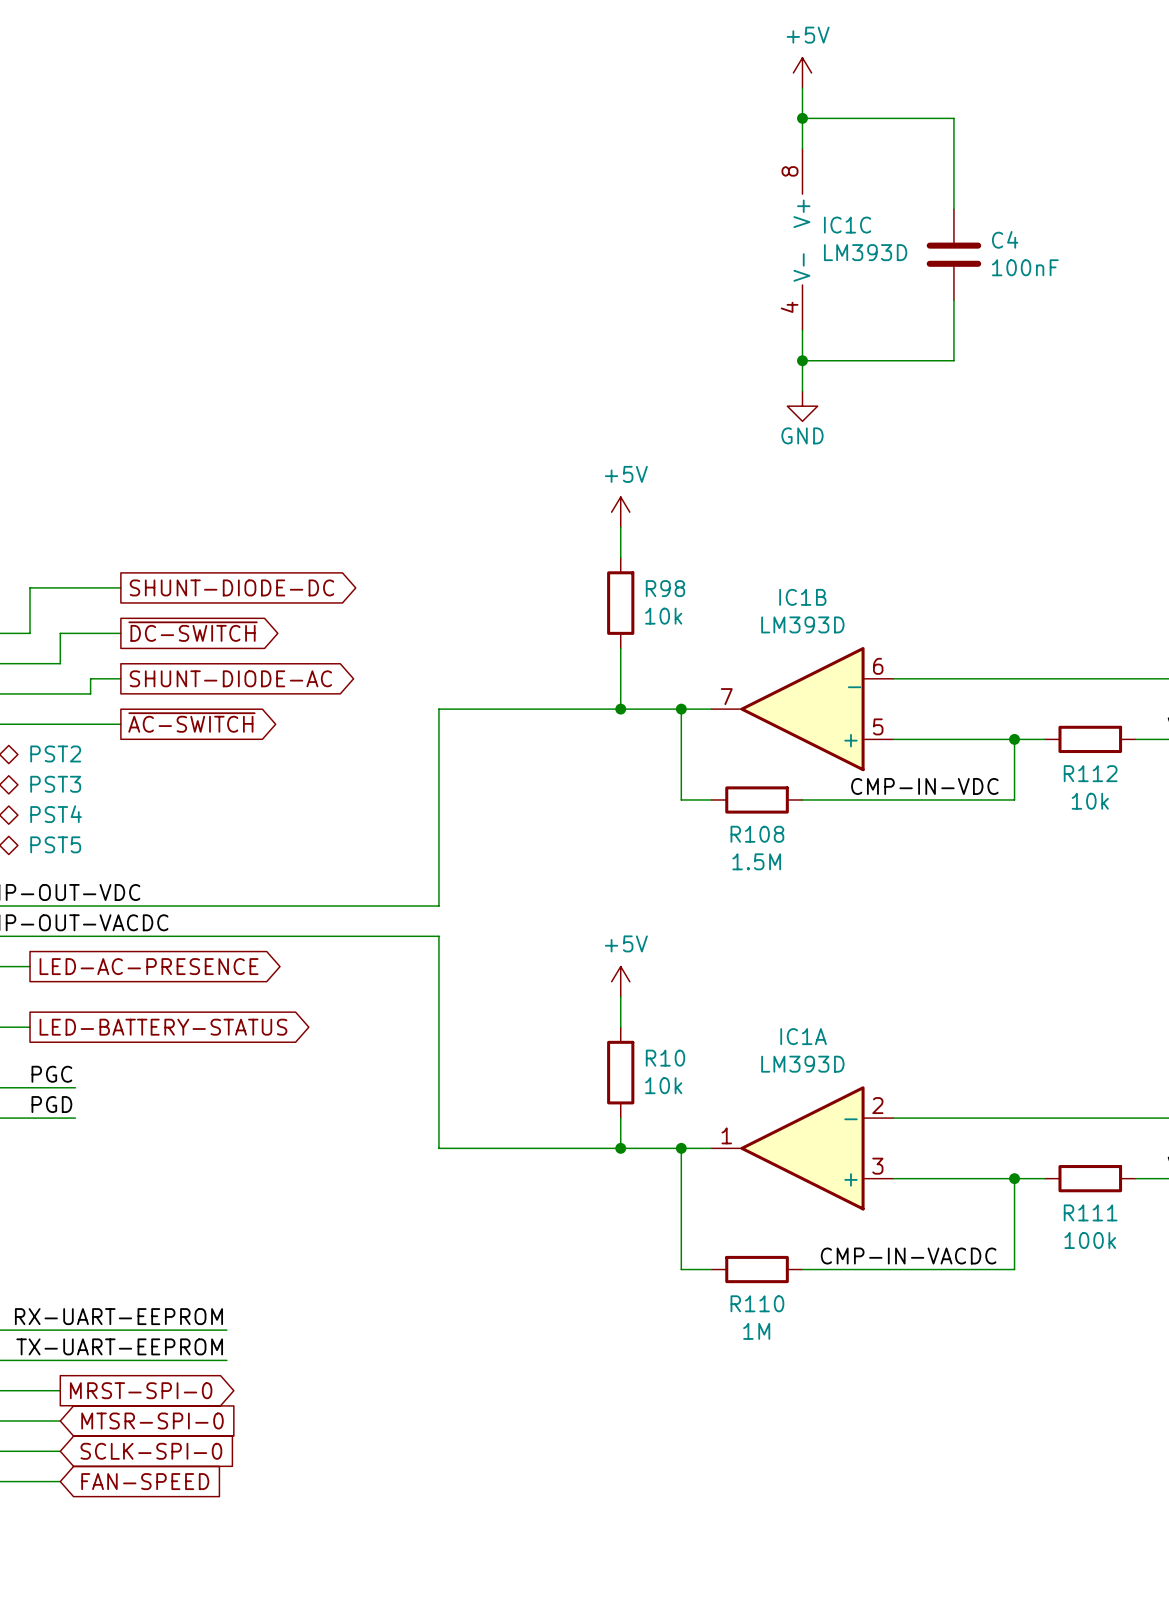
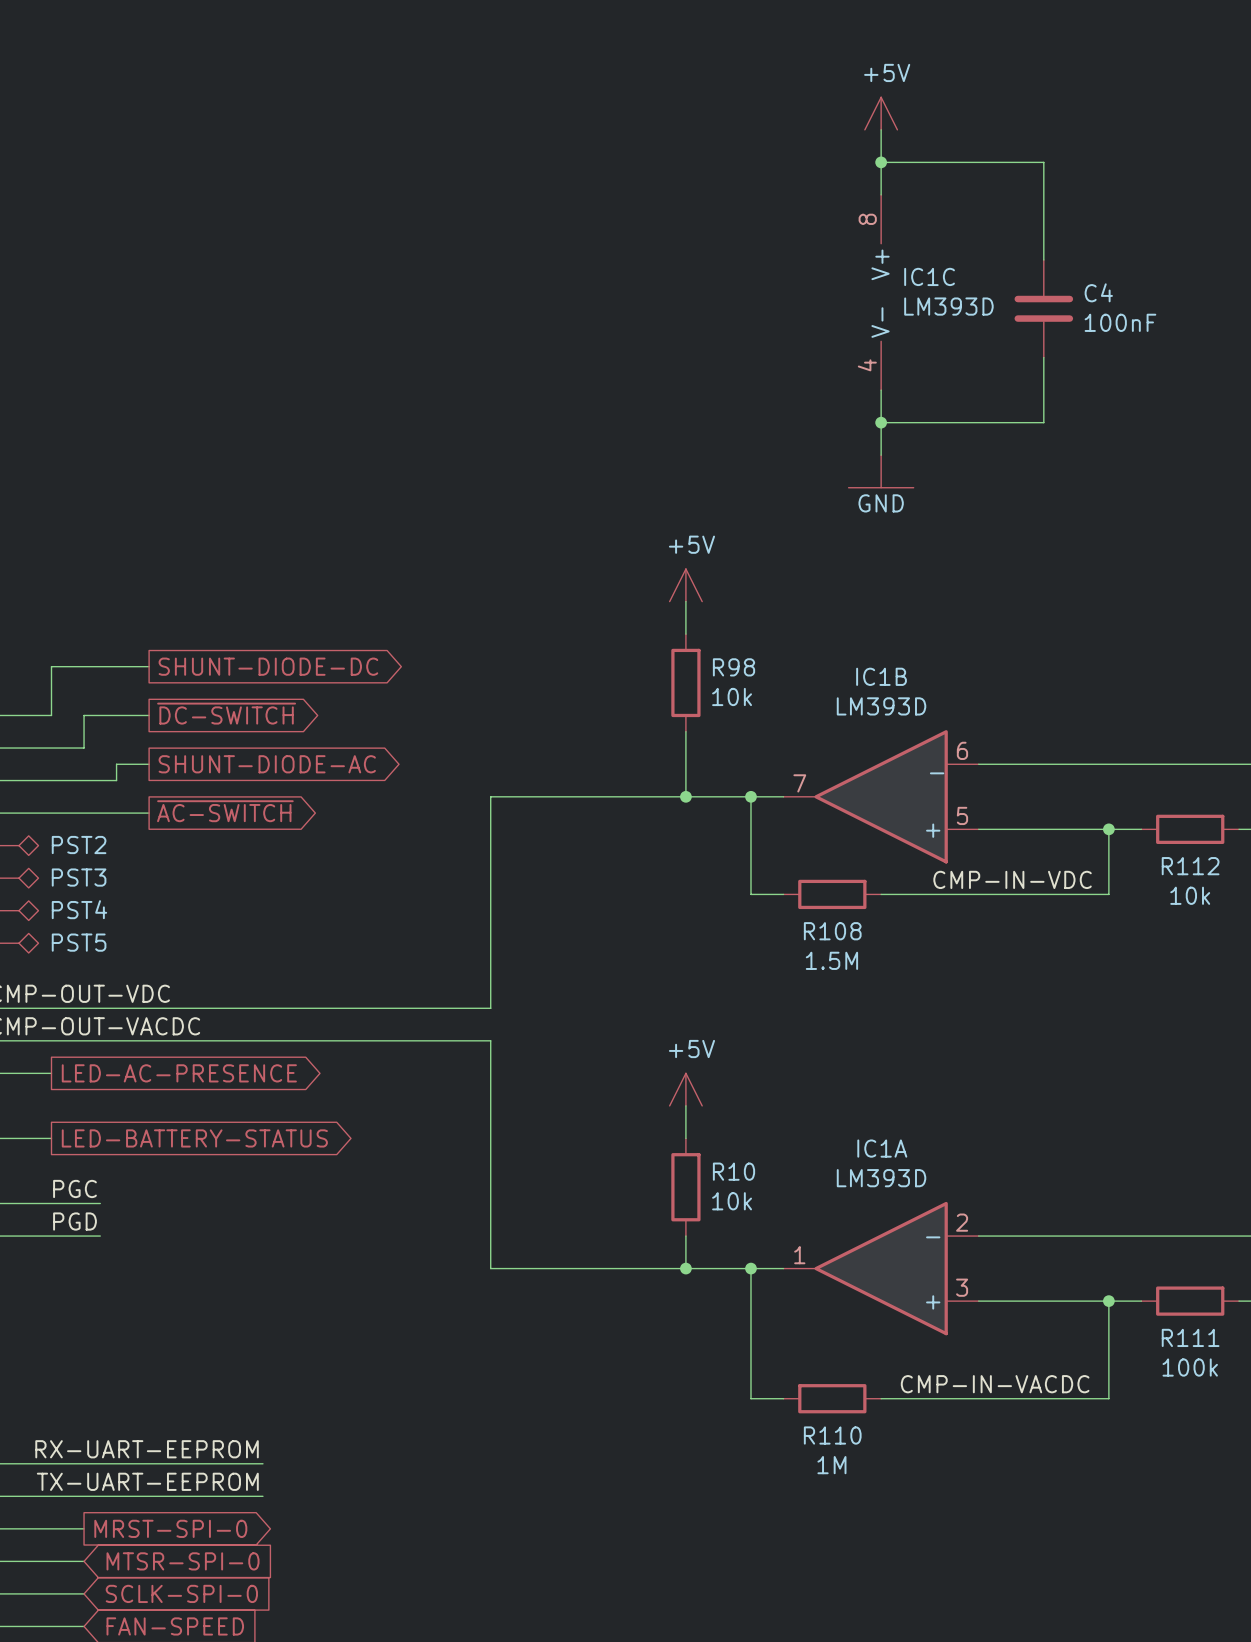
power symbol shape: [793, 57, 812, 89] -> [864, 97, 898, 130]
power symbol shape: [787, 391, 818, 422] -> [848, 455, 914, 488]
power symbol shape: [611, 497, 630, 528] -> [669, 569, 703, 602]
power symbol shape: [611, 966, 630, 997] -> [669, 1073, 703, 1106]

